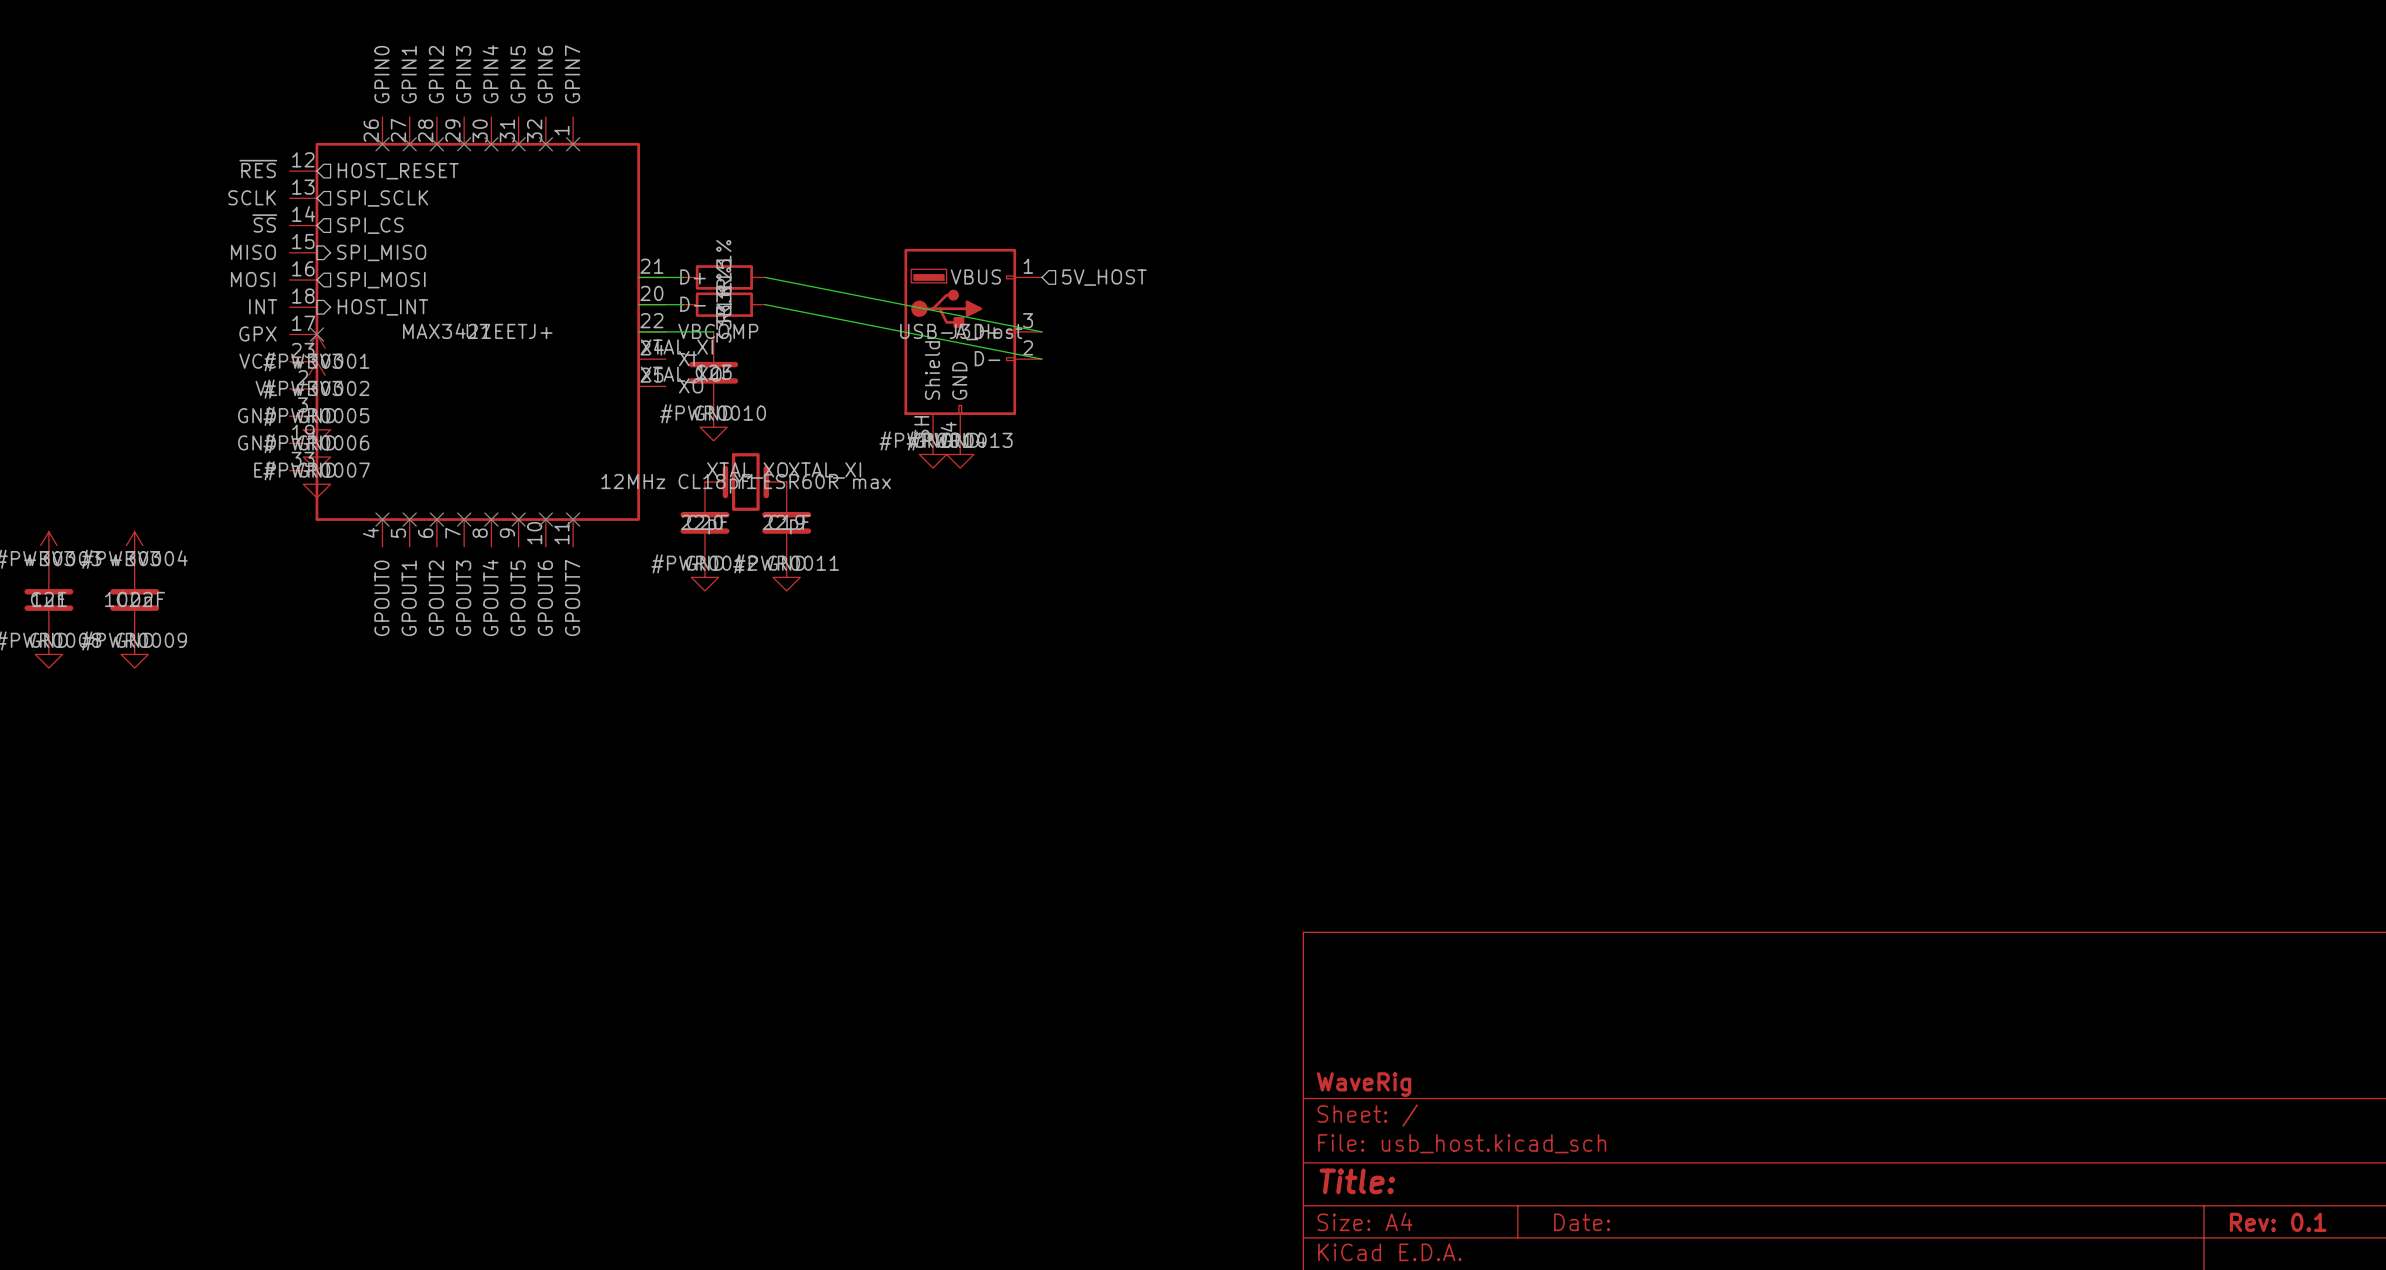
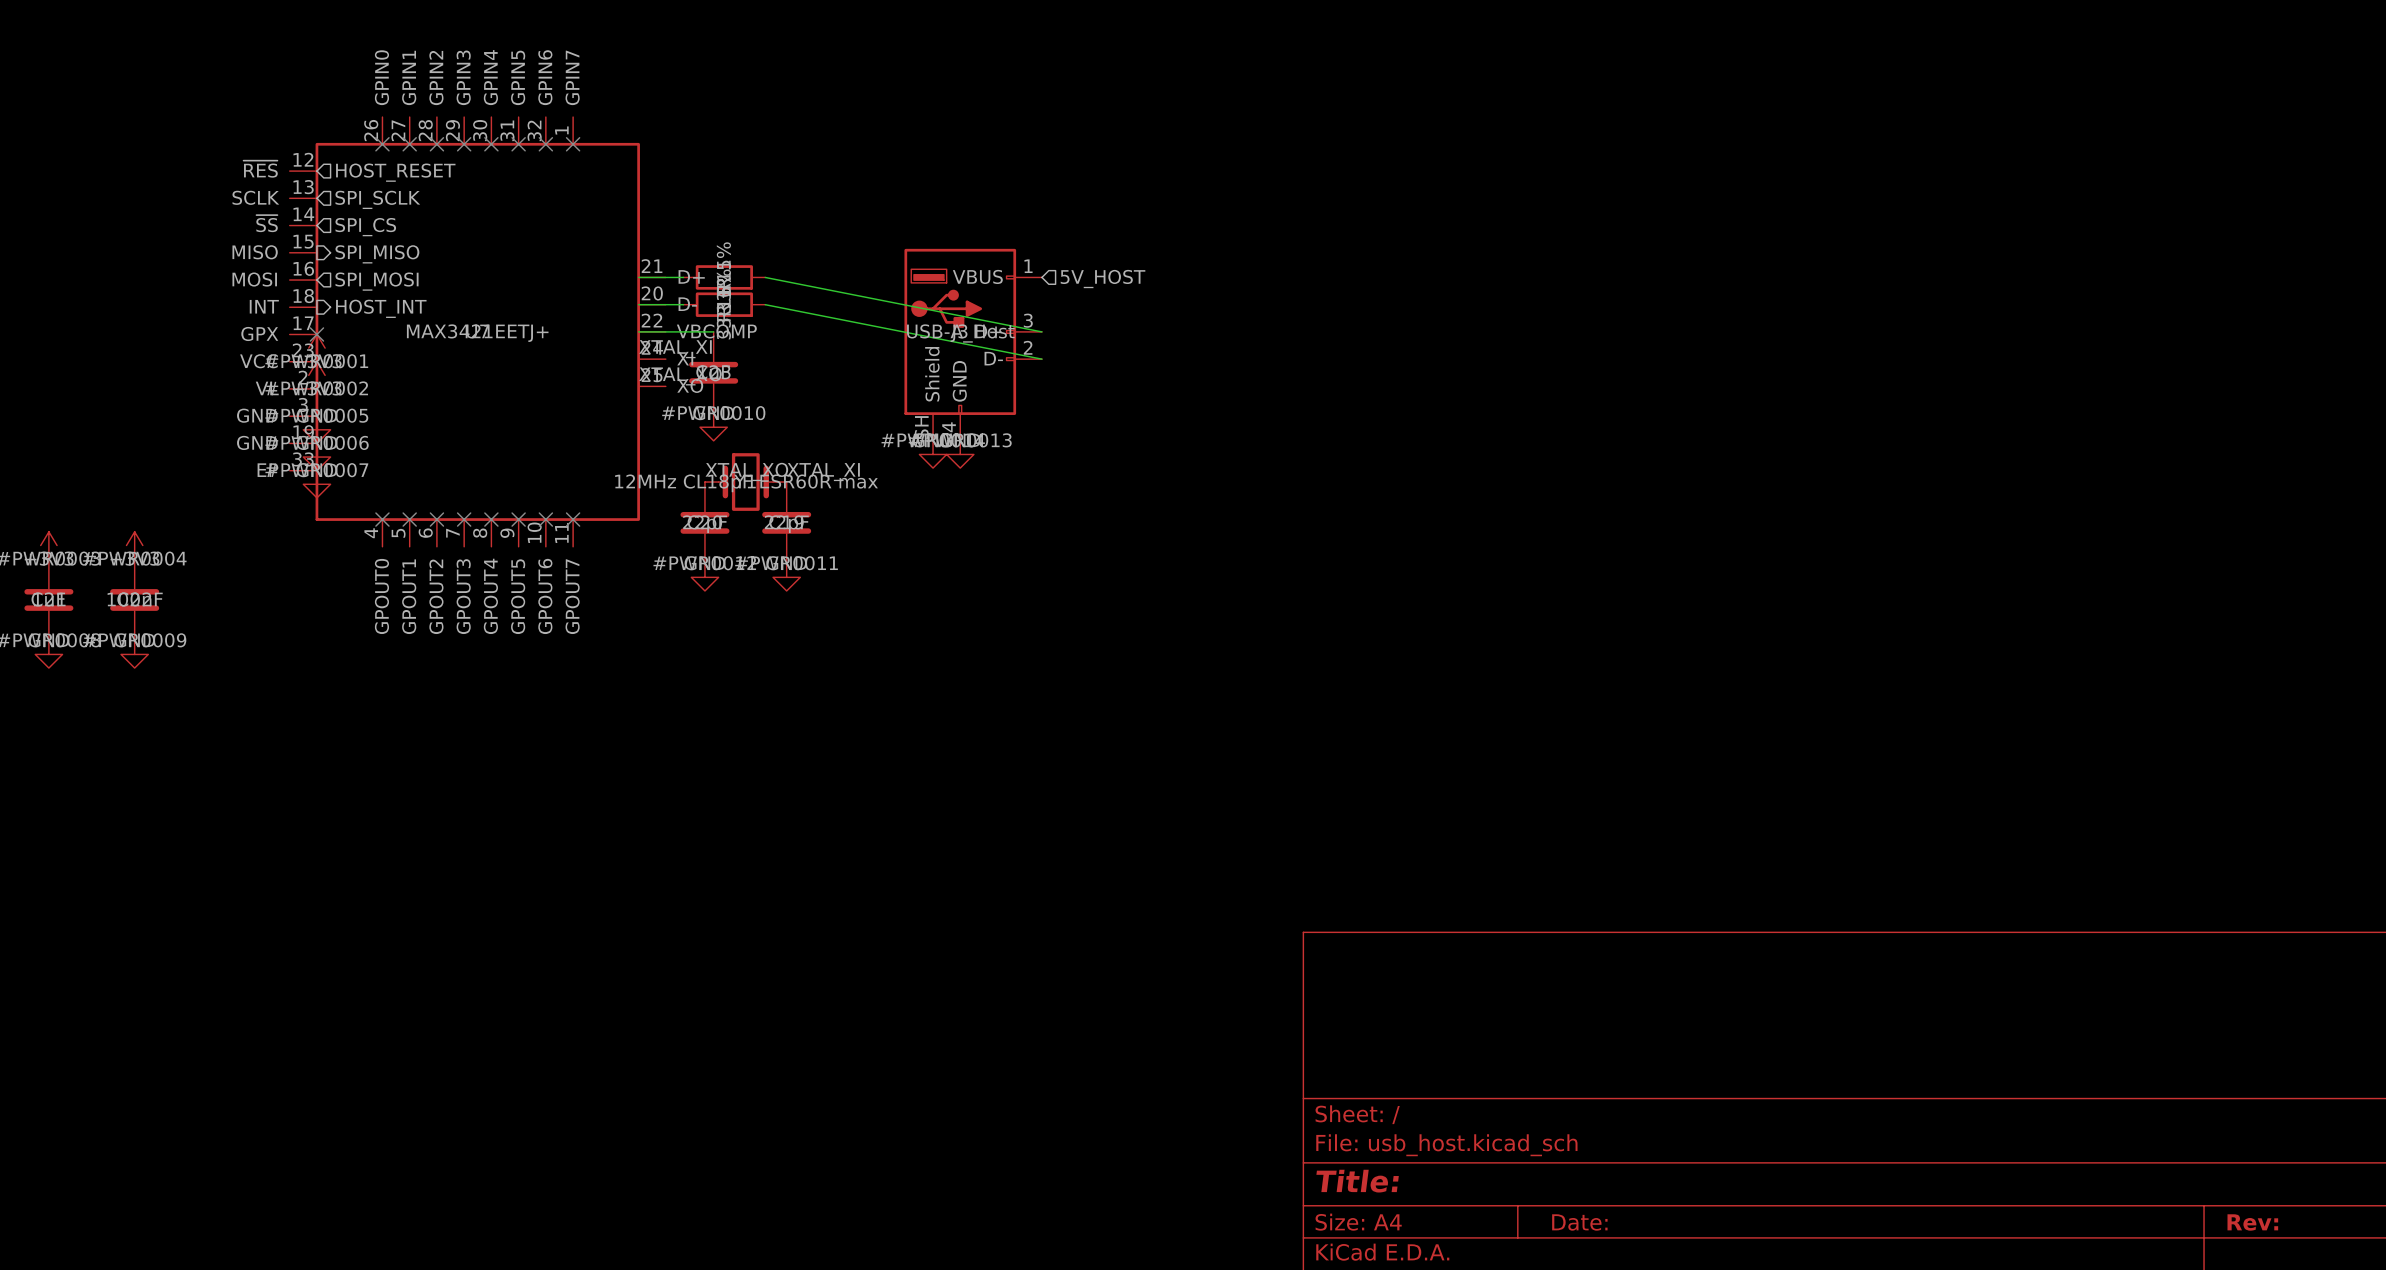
title block: WaveRig (1364, 1084) -> none
title block: Rev: 0.1 (2278, 1222) -> Rev: (2252, 1222)

